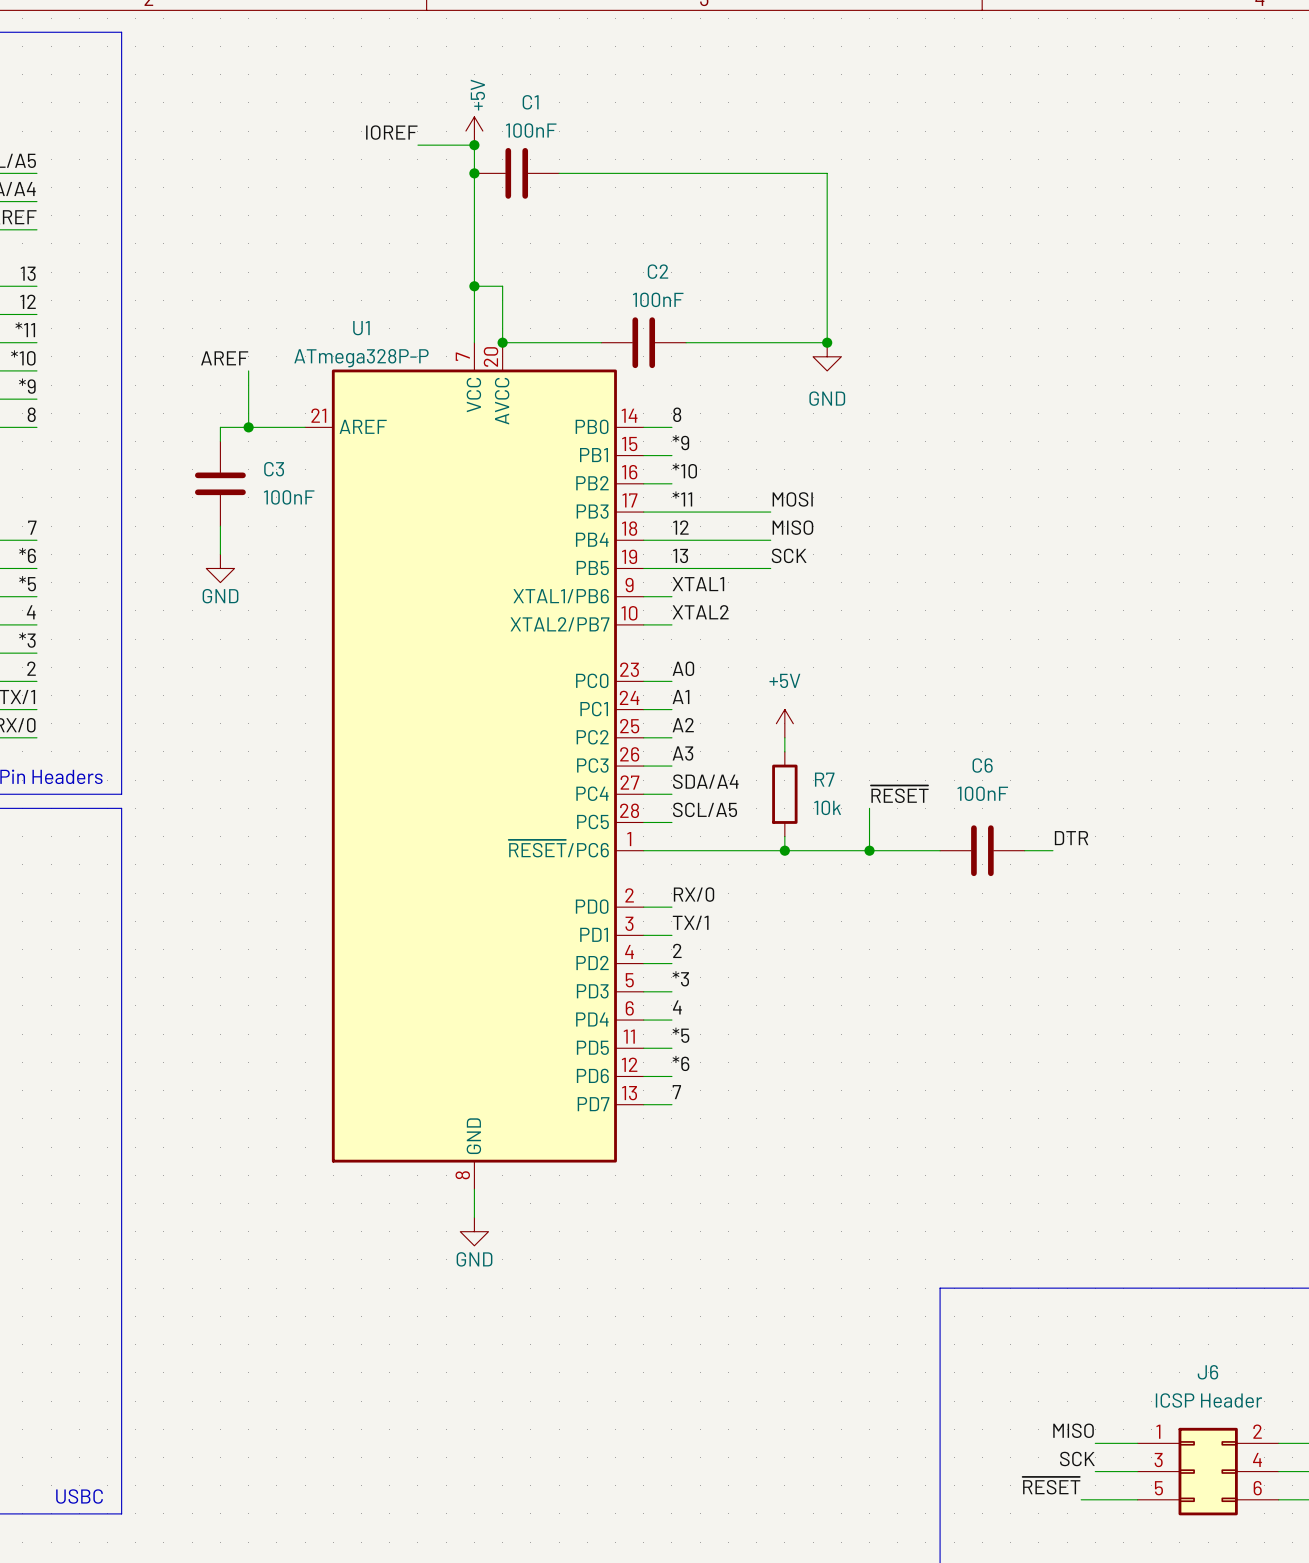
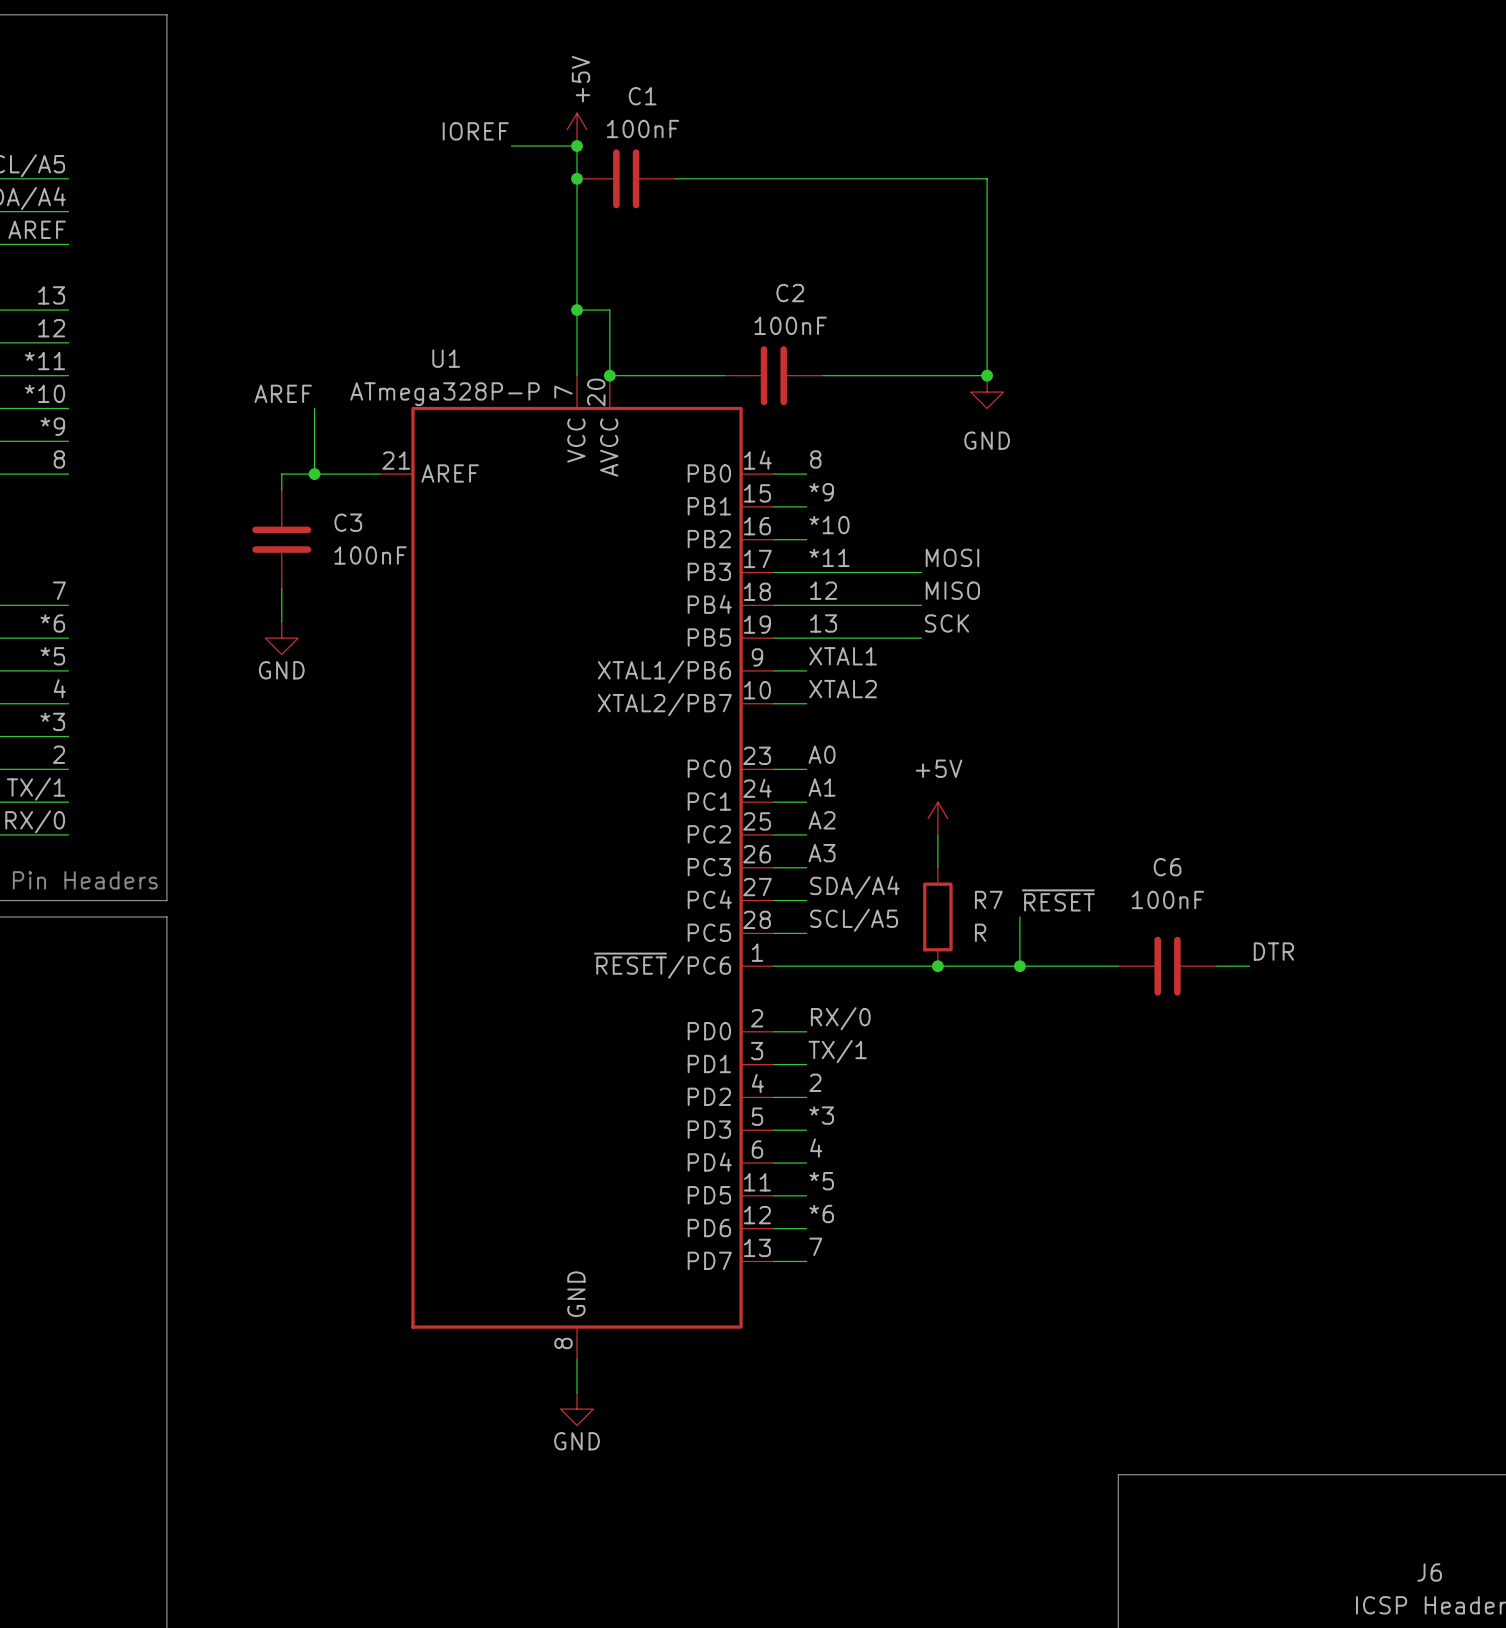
R7 position: (784, 794) -> (937, 916)
label position: ~{RESET} (899, 794) -> ~{RESET} (1058, 900)
R7 value: 10k (827, 807) -> R (980, 932)
wire: (869, 808) (869, 850) -> (1019, 916) (1019, 966)
junction position: (869, 850) -> (1019, 966)

